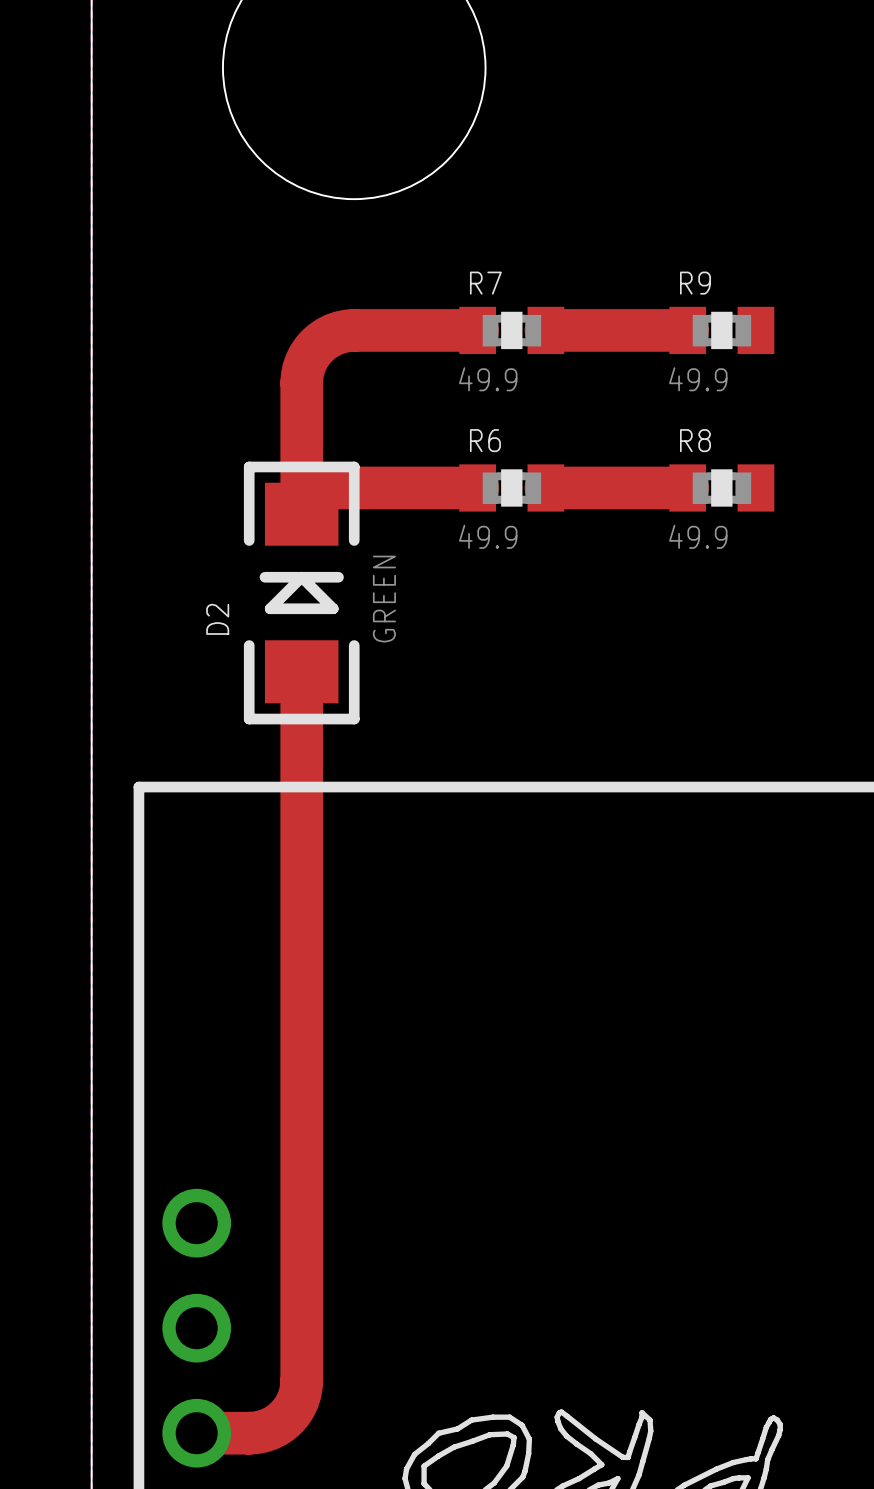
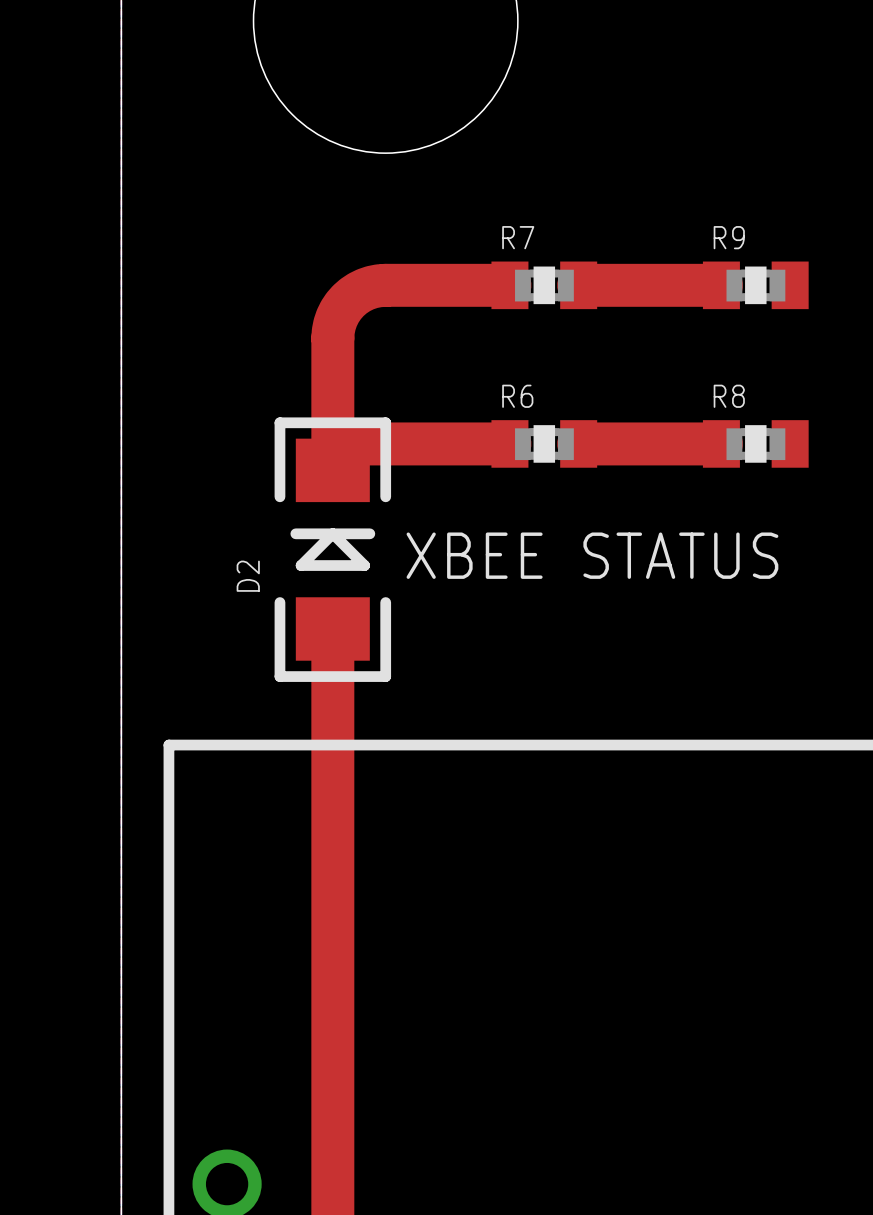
R7 value: 49.9 (488, 379) -> none
R9 value: 49.9 (698, 379) -> none
R6 value: 49.9 (488, 536) -> none
R8 value: 49.9 (698, 536) -> none
text: none -> XBEE STATUS (592, 555)
D2 value: GREEN (384, 599) -> none

